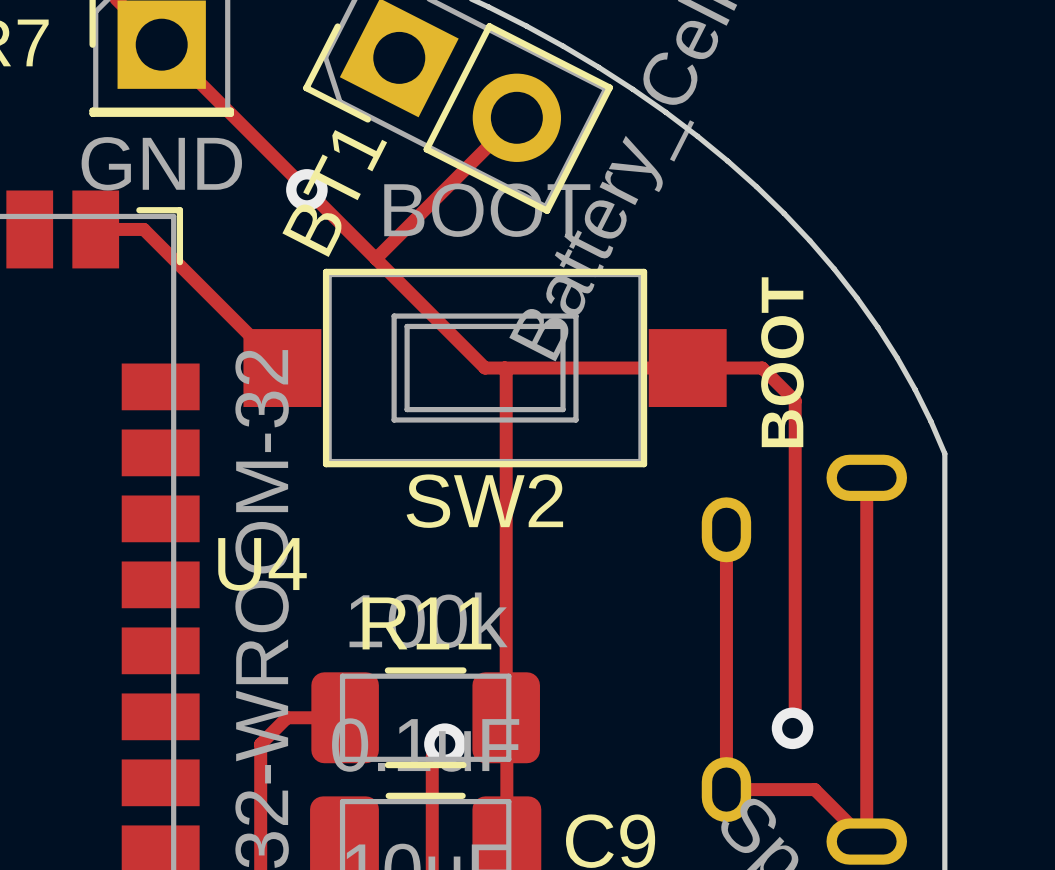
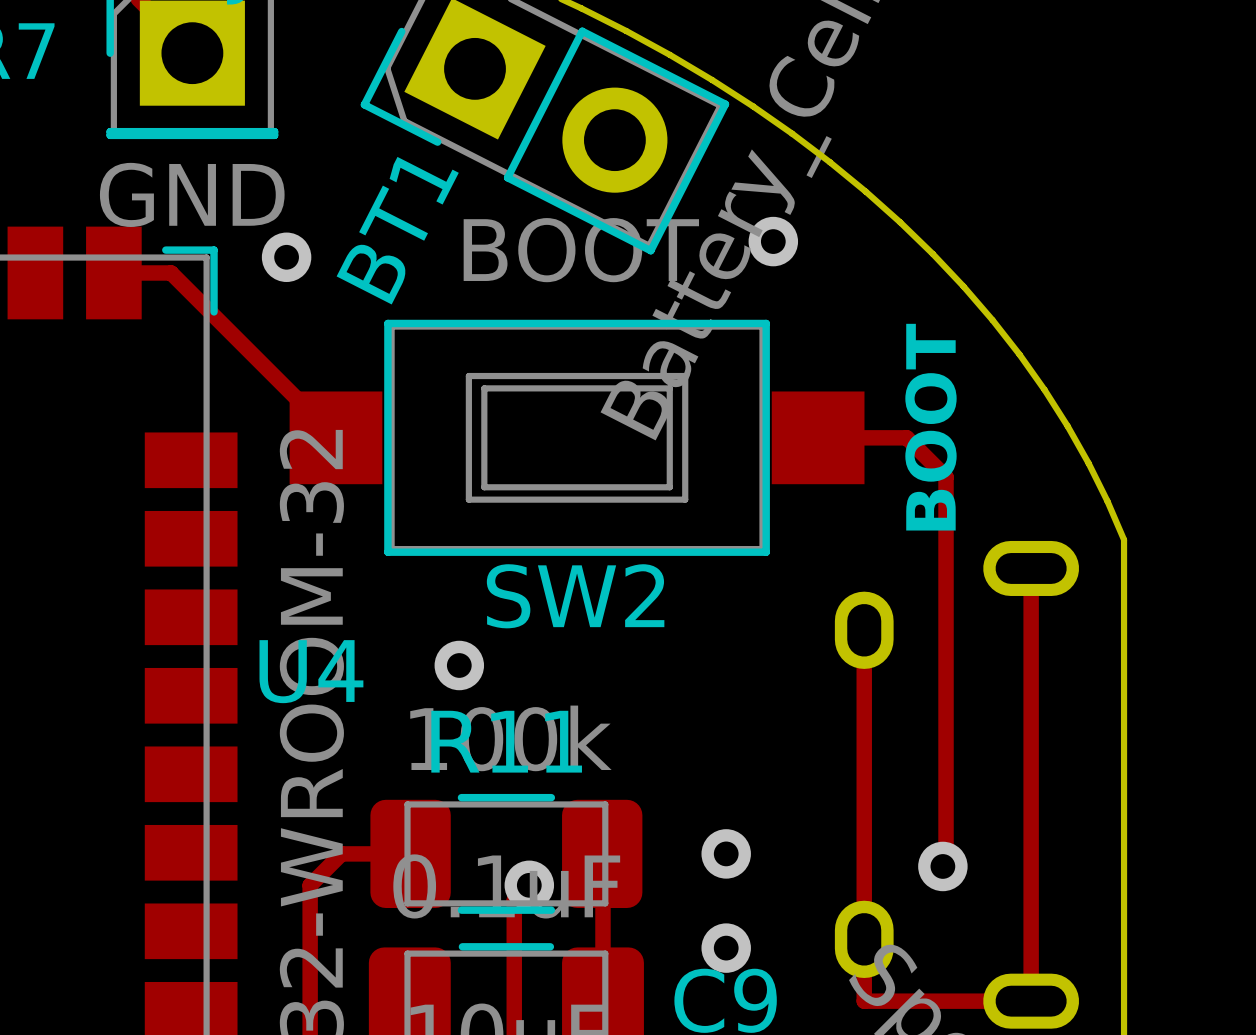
track: (161, 44) (485, 368) (687, 368) -> none
track: (516, 117) (376, 258) -> none
via position: (306, 189) -> (286, 257)
via: none -> (773, 241)
track: (504, 368) (506, 717) -> none
via: none -> (459, 665)
via: none -> (726, 853)
track: (726, 789) (814, 789) (866, 841) -> (864, 939) (864, 1001) (1031, 1001)
via: none -> (726, 948)

